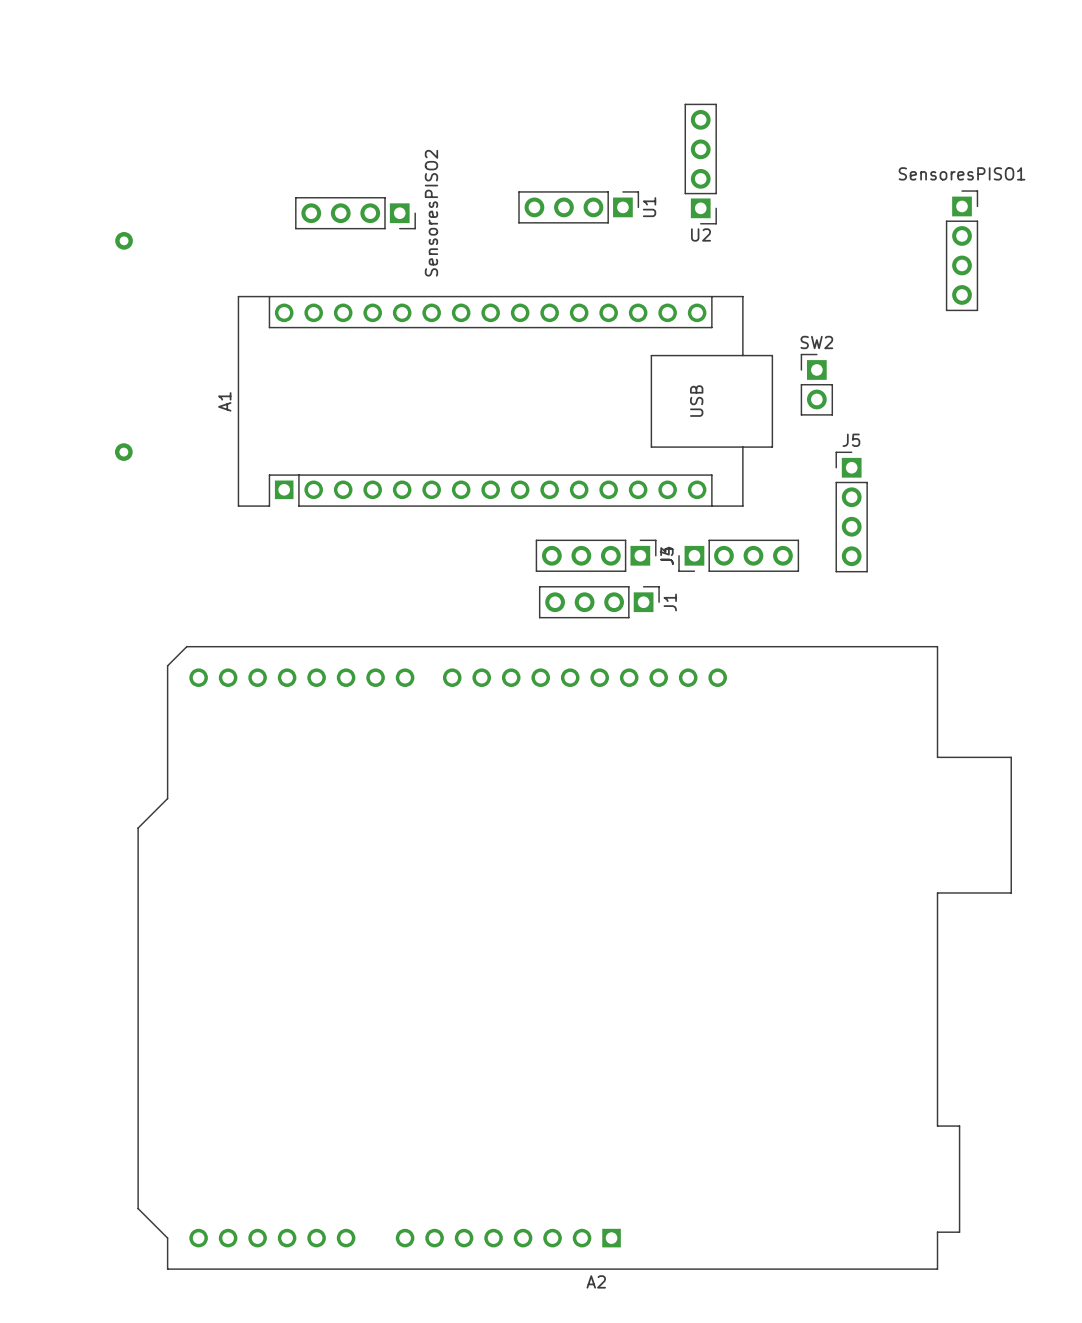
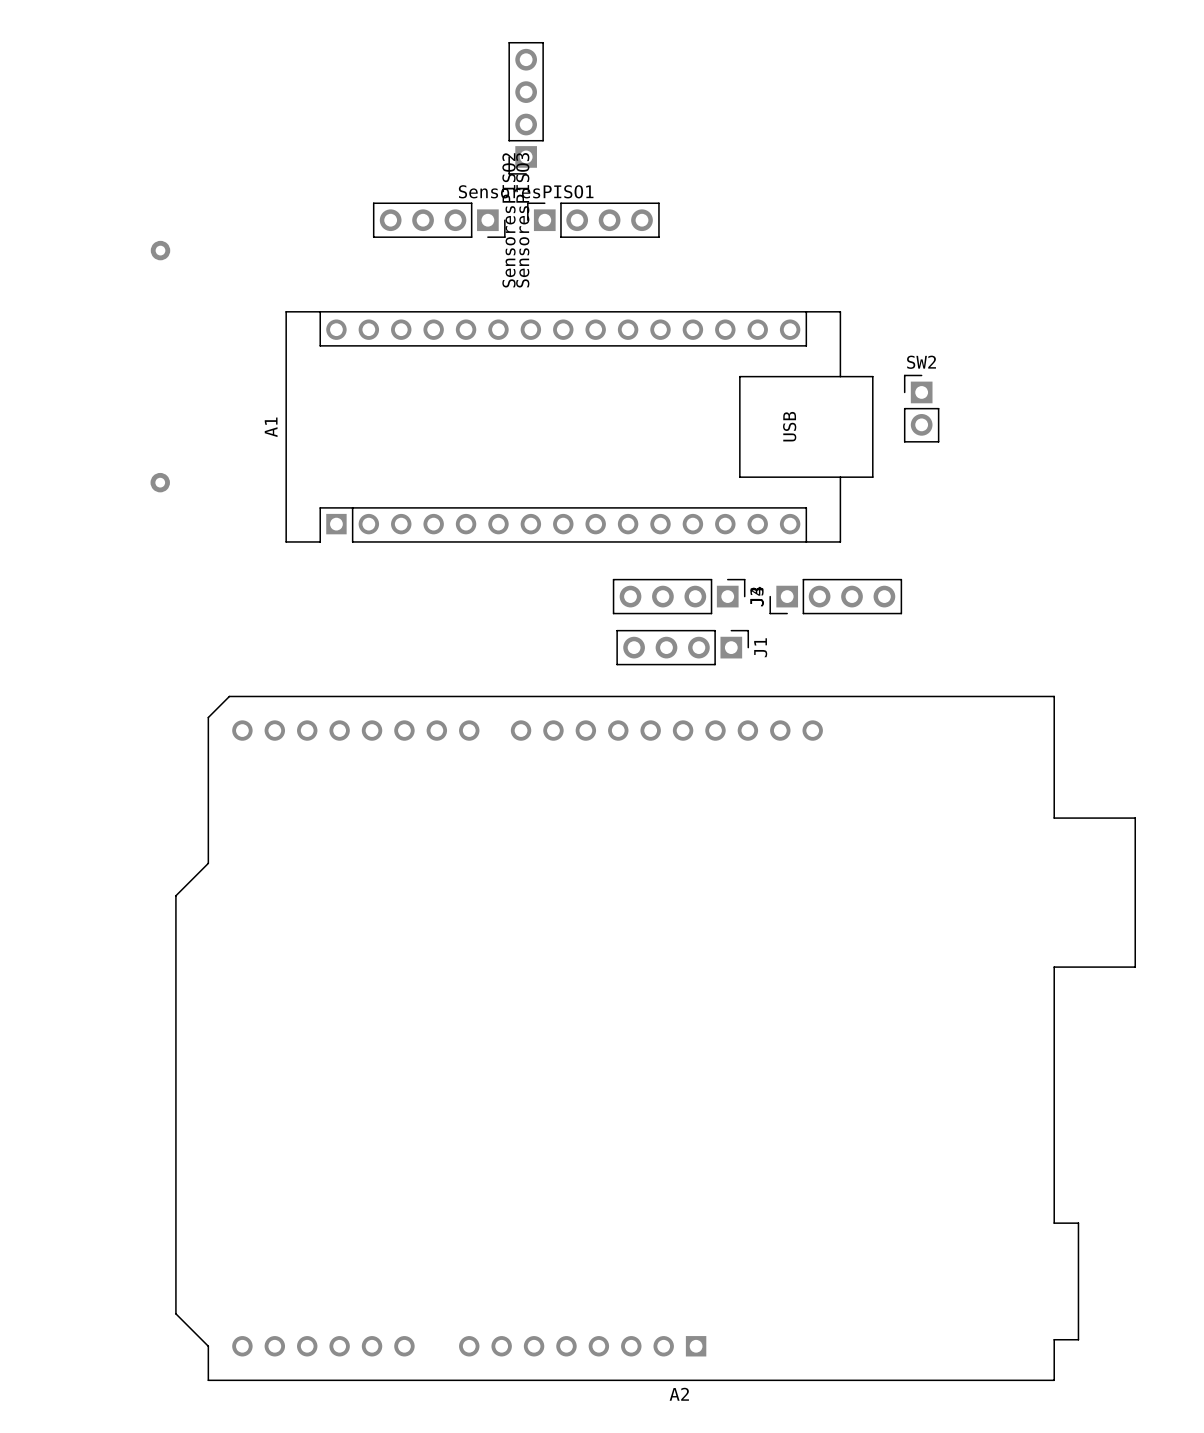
U2: (700, 164) -> none
U1: (578, 207) -> none
SensoresPISO2 rotation: 0° (355, 213) -> 180° (593, 220)
SensoresPISO2 position: (355, 213) -> (593, 220)
SensoresPISO3: none -> (439, 220)
SensoresPISO1 rotation: 0° (962, 250) -> 180° (526, 108)
SensoresPISO1 position: (962, 250) -> (526, 108)
J5: (851, 511) -> none

